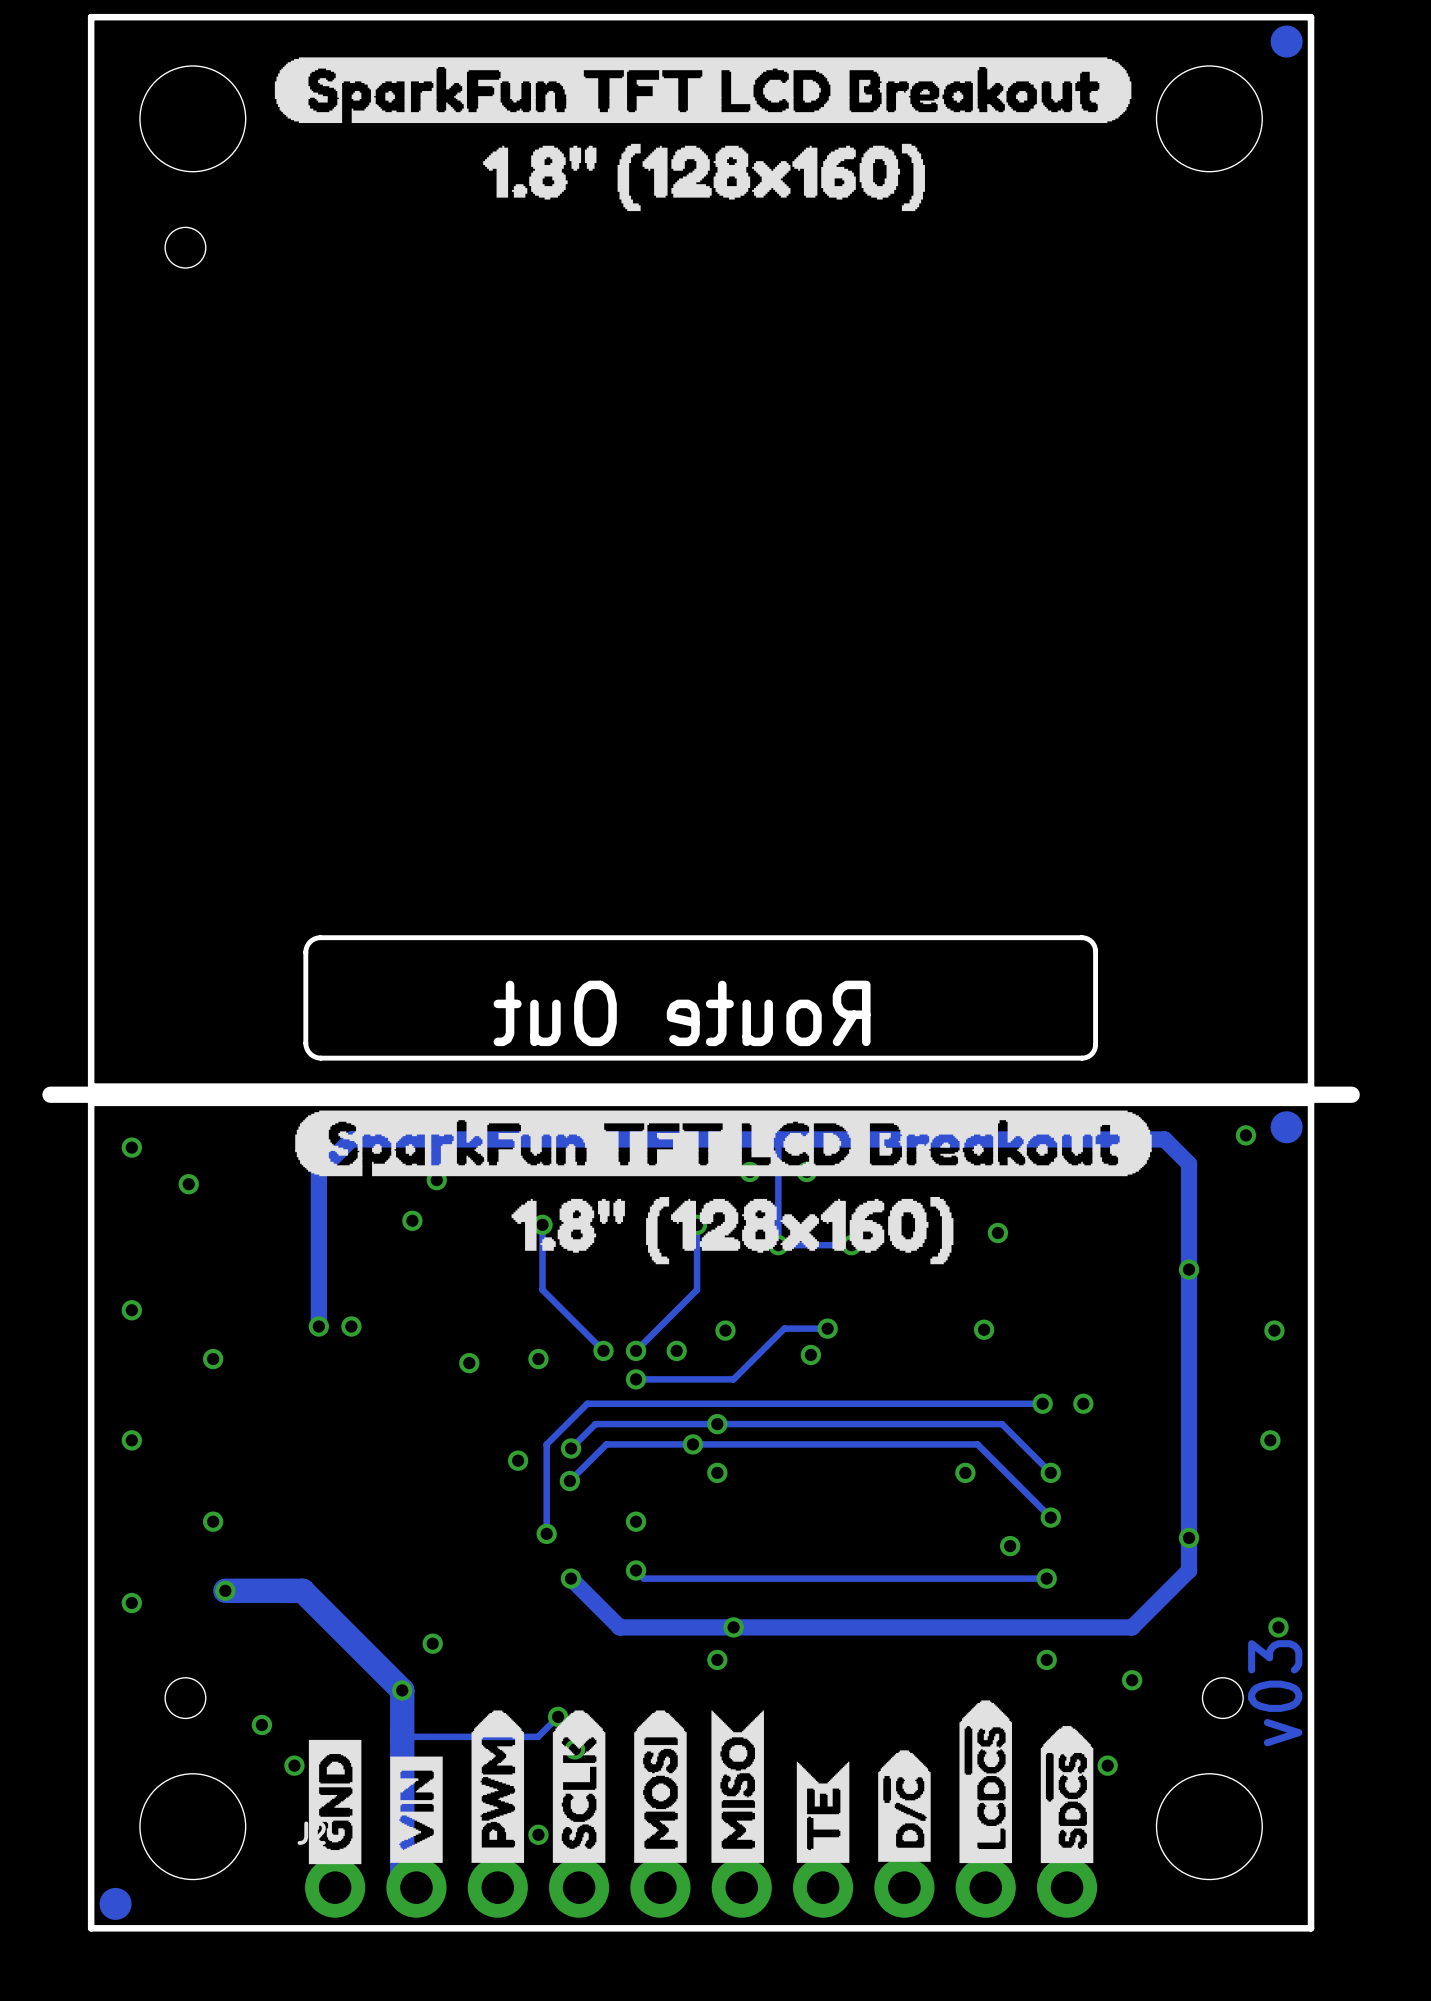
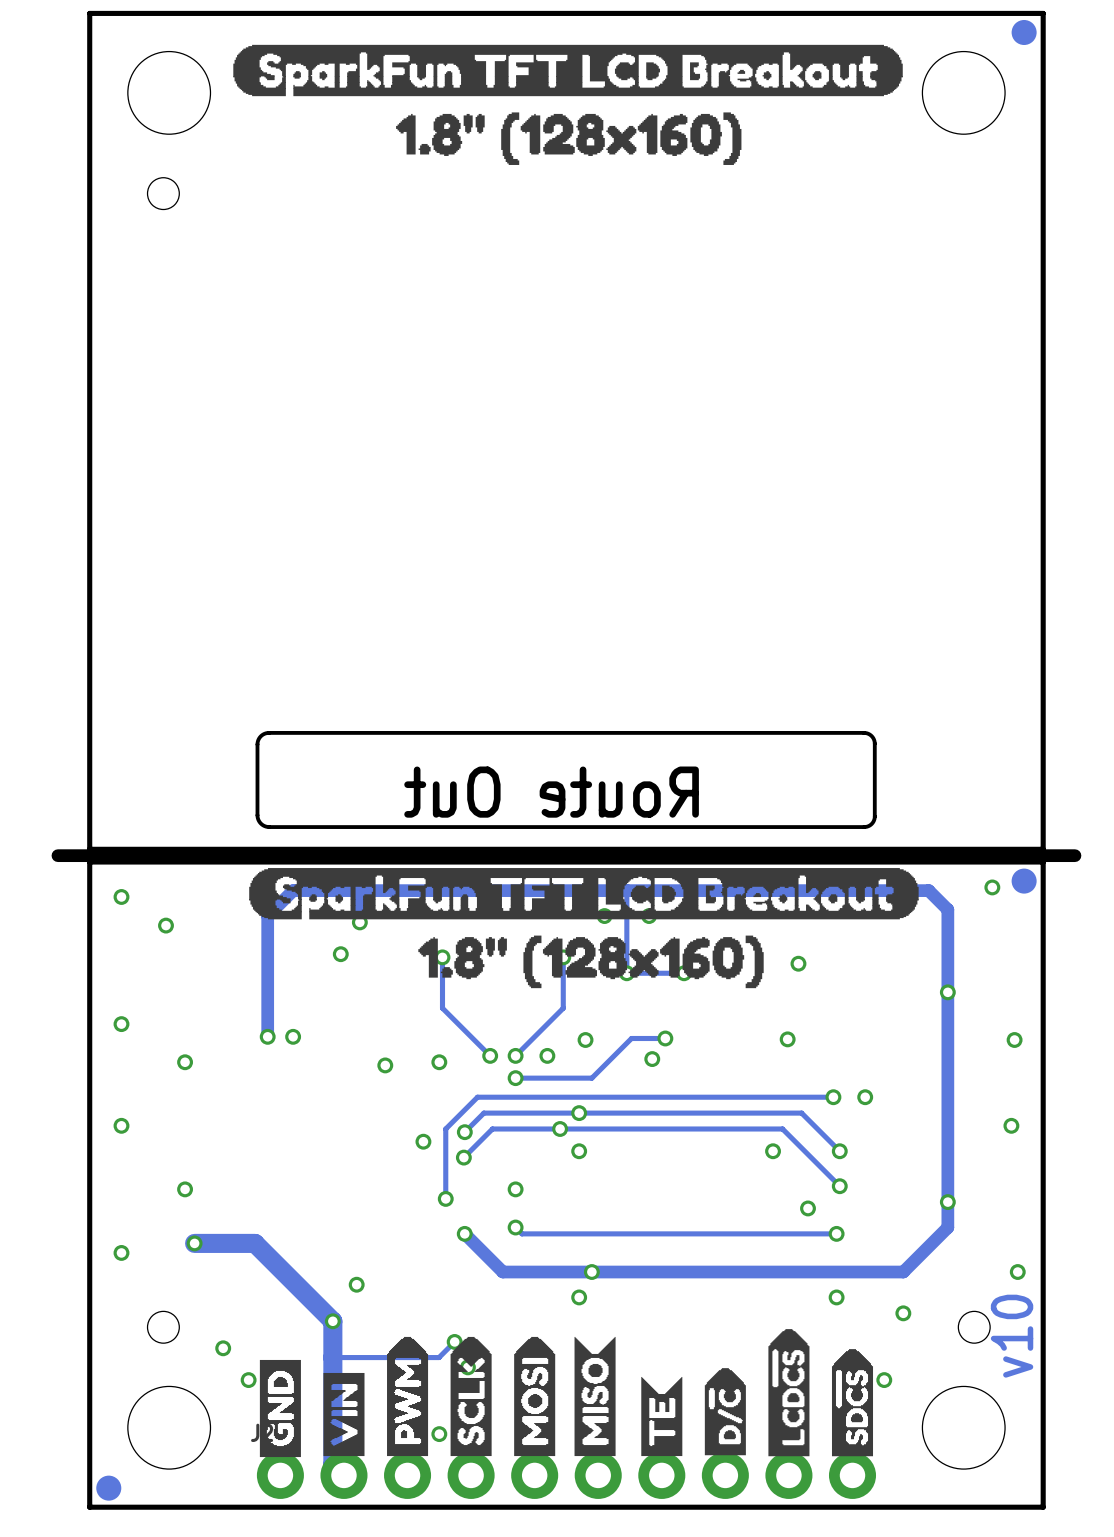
text: v03 (1275, 1693) -> v10 (1012, 1336)

